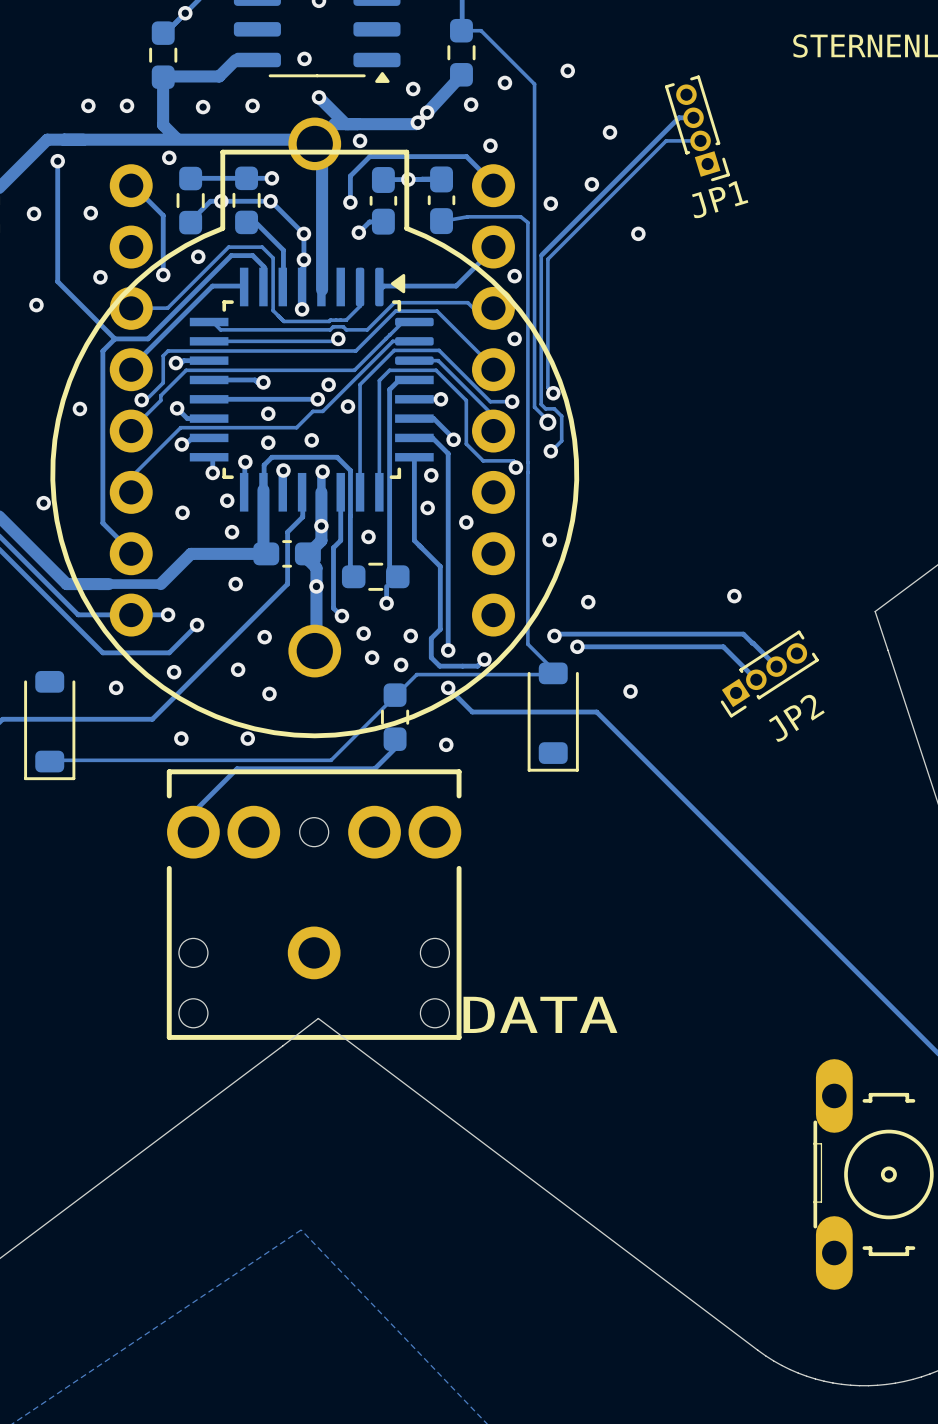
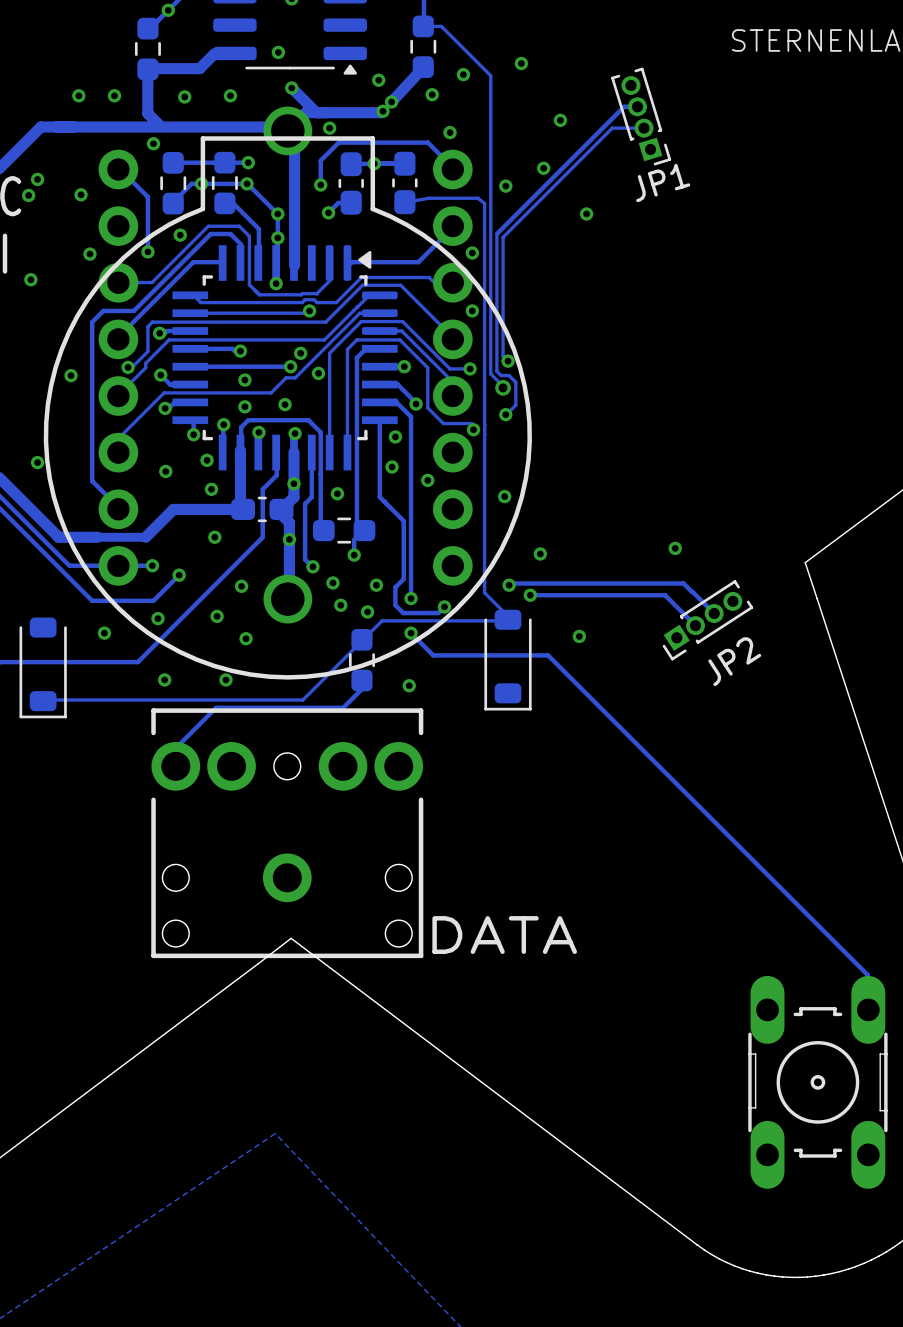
track: (57, 161) (57, 281) (114, 338) -> none
via position: (57, 161) -> (37, 179)

